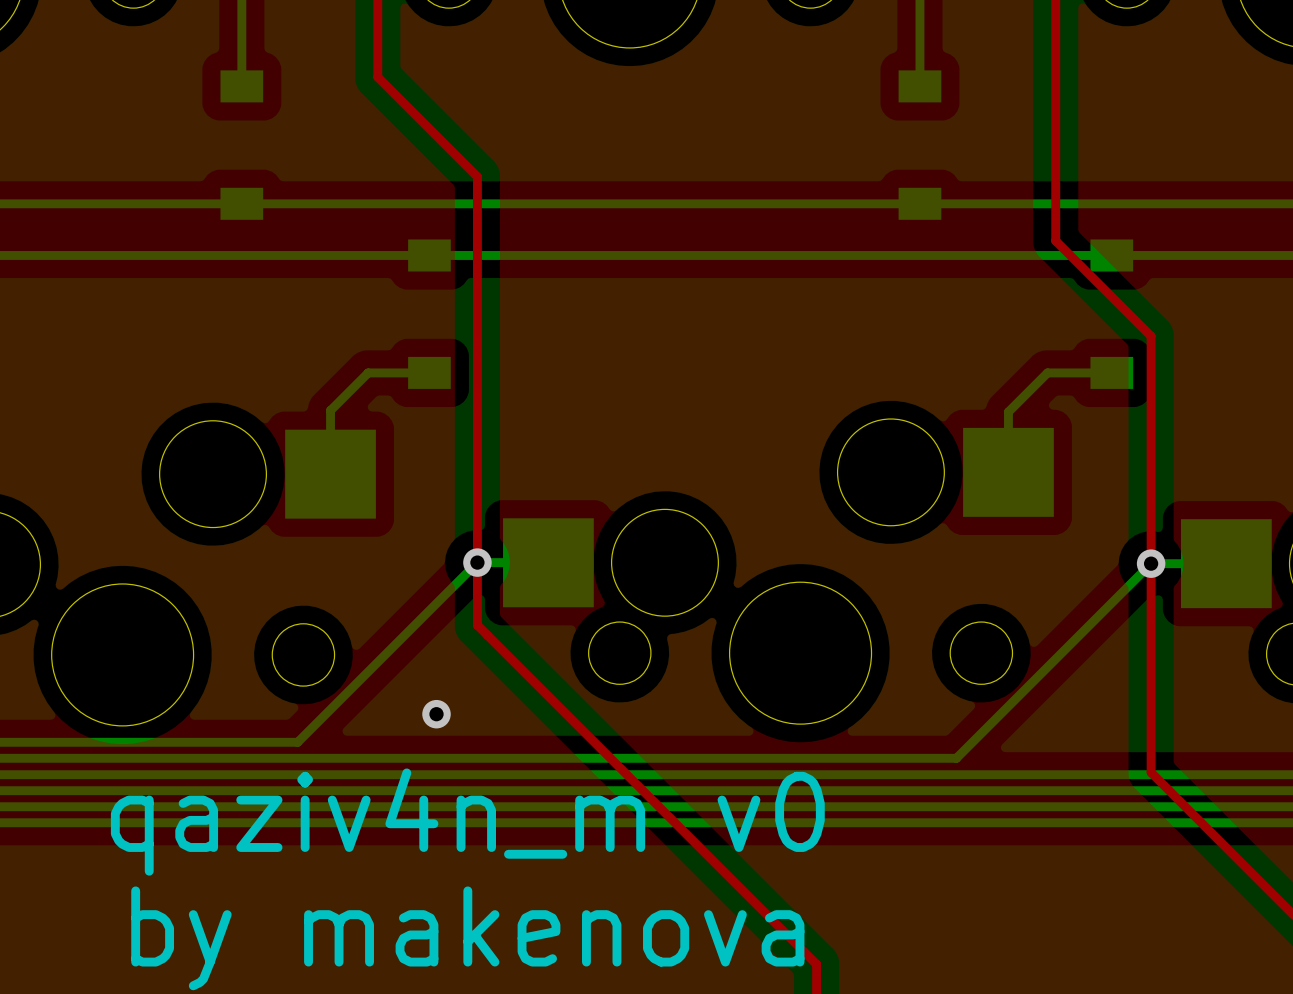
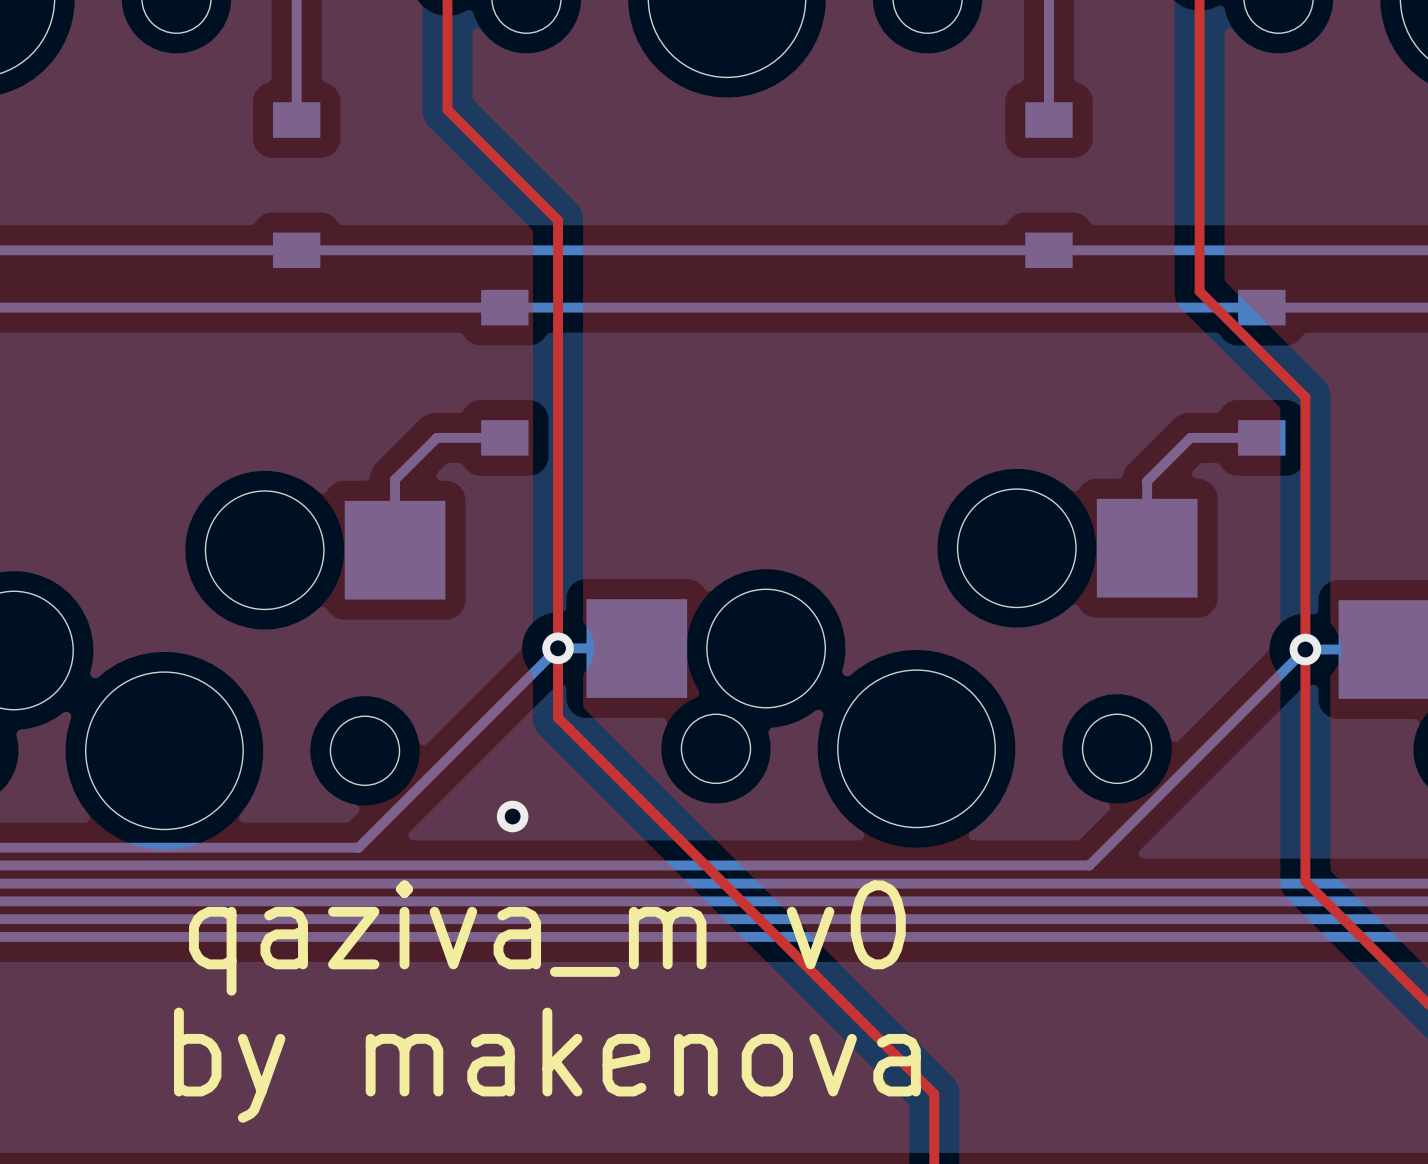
text: qaziv4n_m v0 (467, 822) -> qaziva_m v0 (547, 938)

